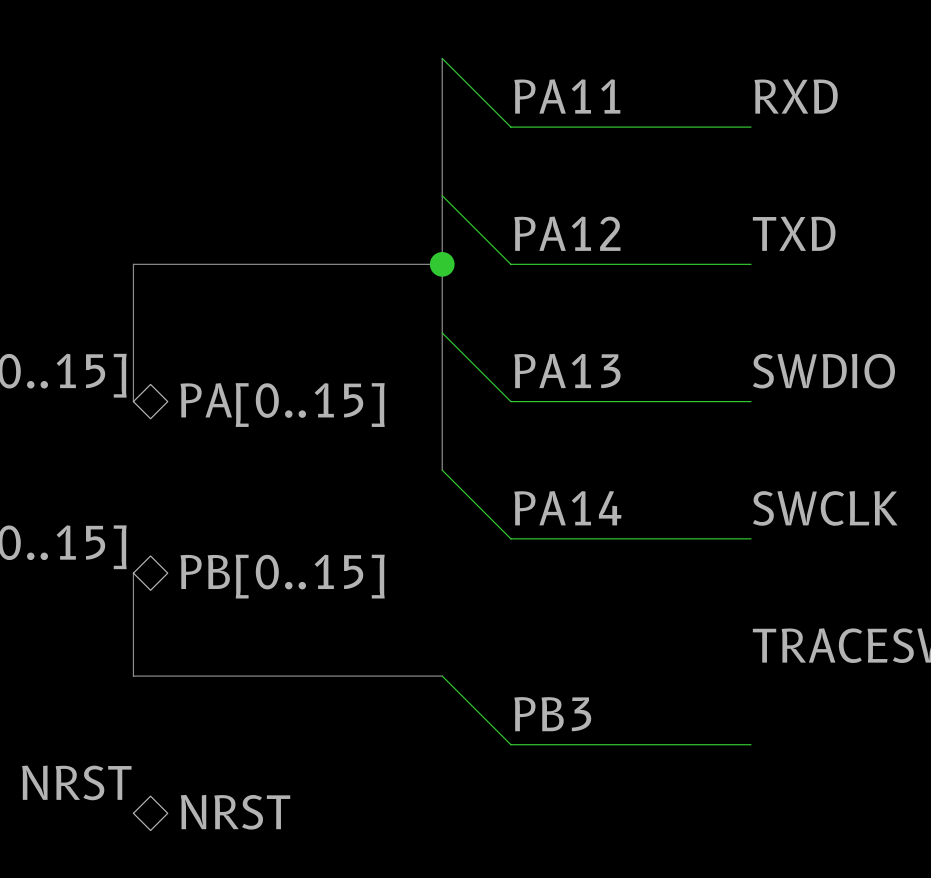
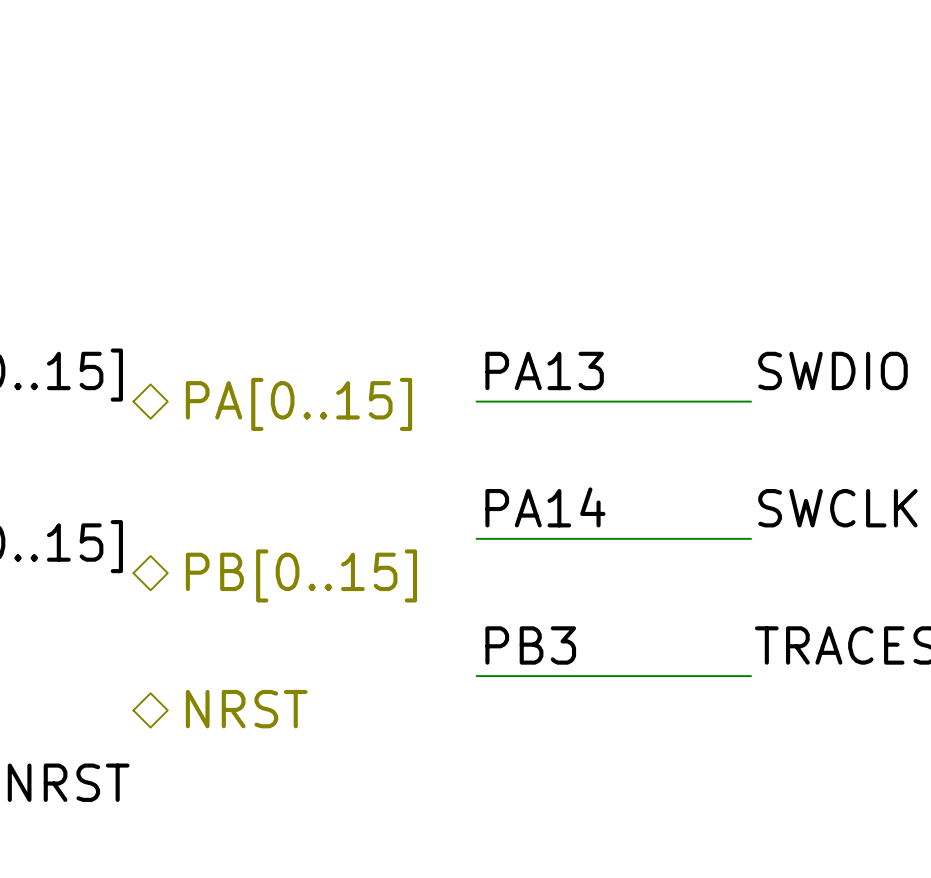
wire: (442, 58) (510, 127) (751, 127) -> none
bus: (442, 58) (442, 470) -> none
label: PA11 (567, 96) -> none
label: RXD (796, 96) -> none
wire: (442, 195) (510, 264) (751, 264) -> none
label: PA12 (567, 233) -> none
label: TXD (794, 233) -> none
bus: (442, 264) (133, 264) (133, 401) -> none
junction: (442, 264) -> none
wire: (442, 332) (510, 401) -> (476, 401) (510, 401)
label position: PA13 (567, 370) -> PA13 (544, 370)
wire: (442, 470) (510, 538) -> (476, 538) (510, 538)
label position: PA14 (567, 508) -> PA14 (545, 507)
bus: (133, 573) (133, 676) (442, 676) -> none
wire: (442, 676) (510, 744) (751, 744) -> none
wire: none -> (476, 676) (751, 676)
label position: PB3 (552, 714) -> PB3 (530, 645)
hierarchical label position: NRST (235, 812) -> NRST (246, 709)

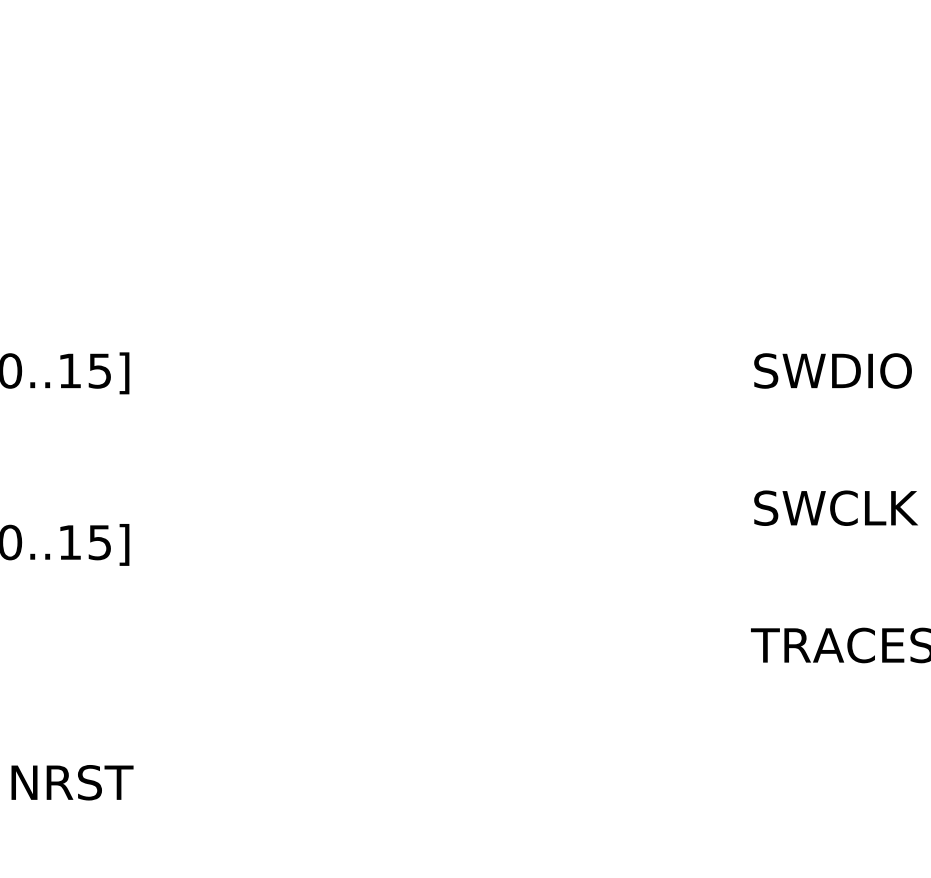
label: PA13 (544, 370) -> none
wire: (476, 401) (751, 401) -> none
hierarchical label: PA[0..15] (299, 404) -> none
label: PA14 (545, 507) -> none
wire: (476, 538) (751, 538) -> none
hierarchical label: PB[0..15] (301, 575) -> none
label: PB3 (530, 645) -> none
wire: (476, 676) (751, 676) -> none
hierarchical label: NRST (246, 709) -> none

